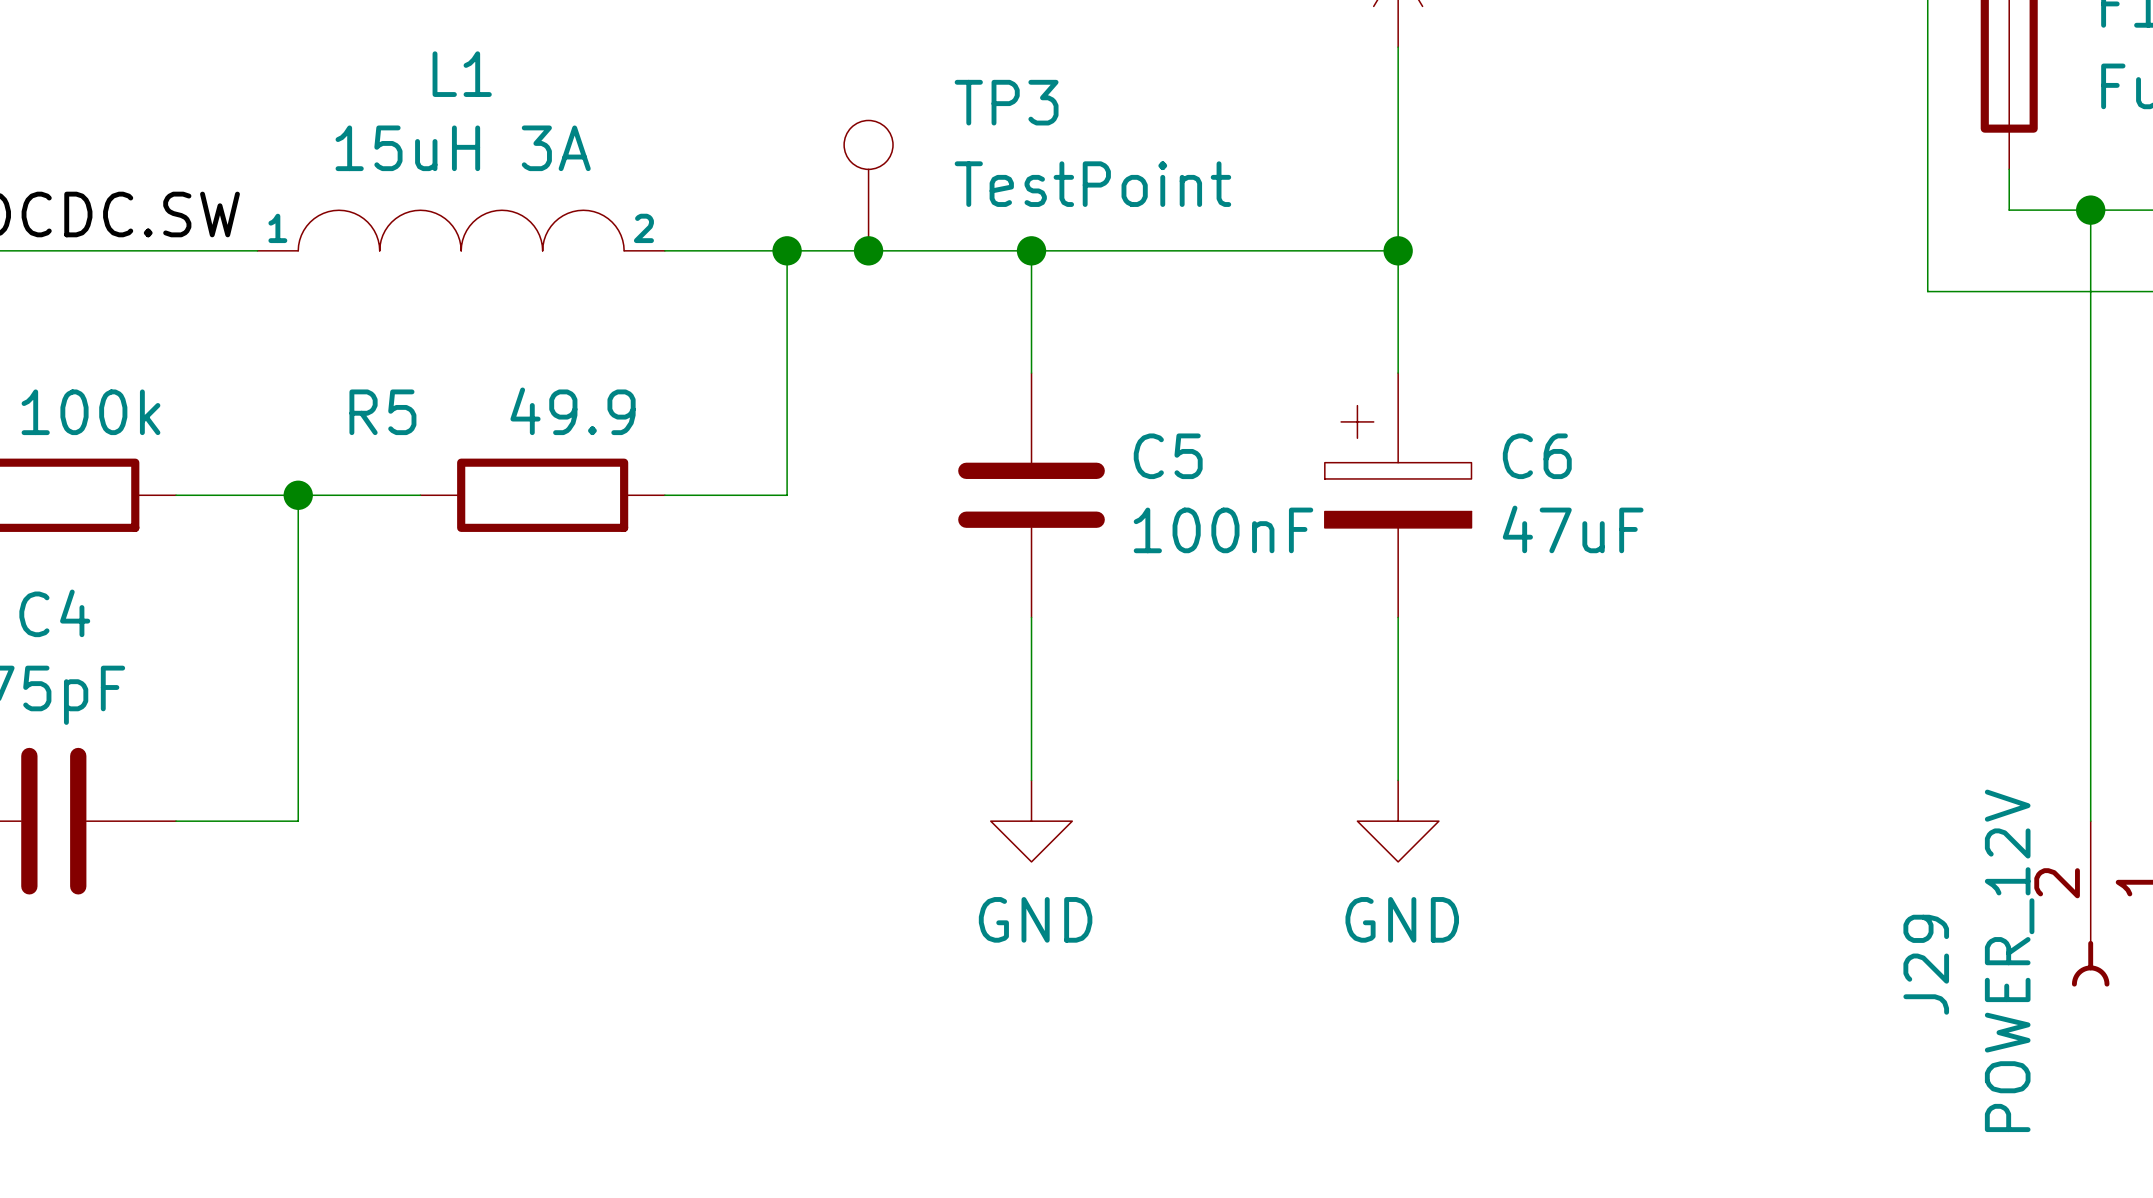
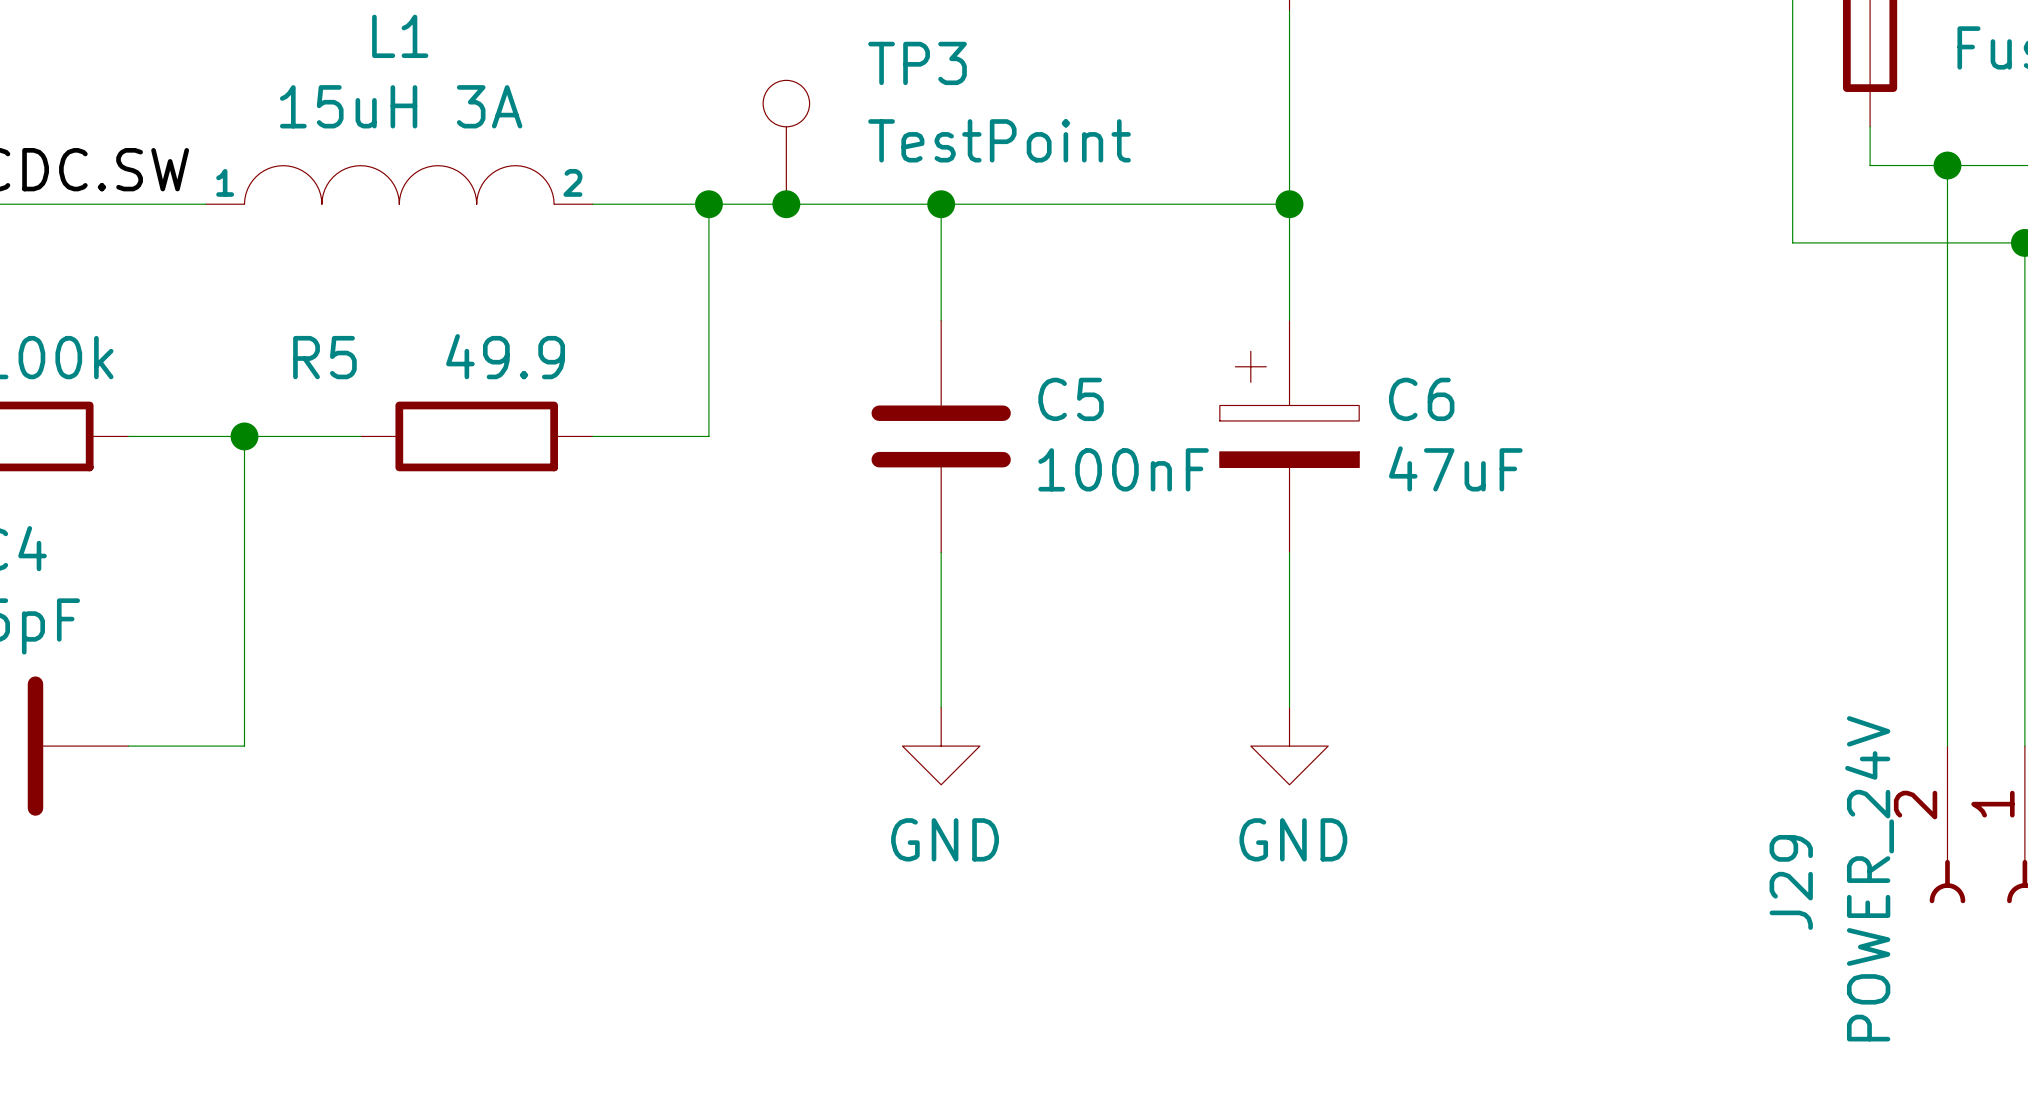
J29 value: POWER_12V (2009, 960) -> POWER_24V (1869, 878)

